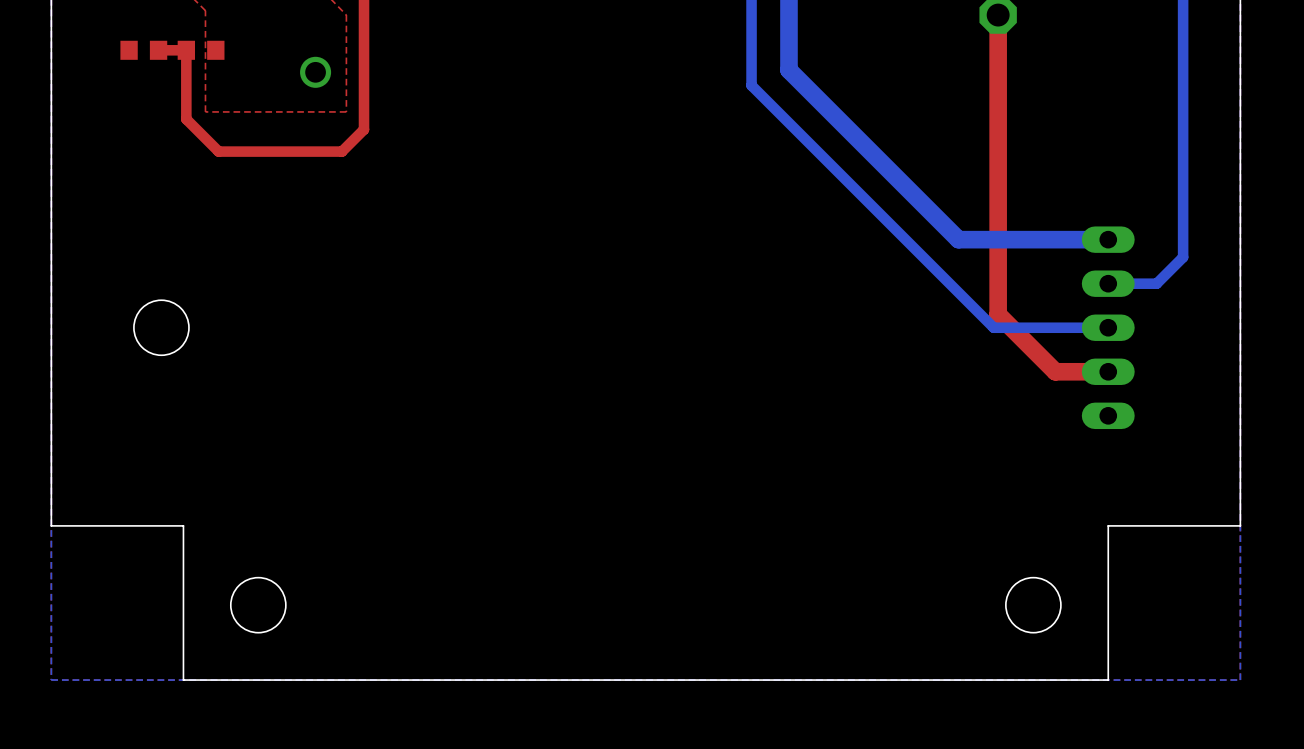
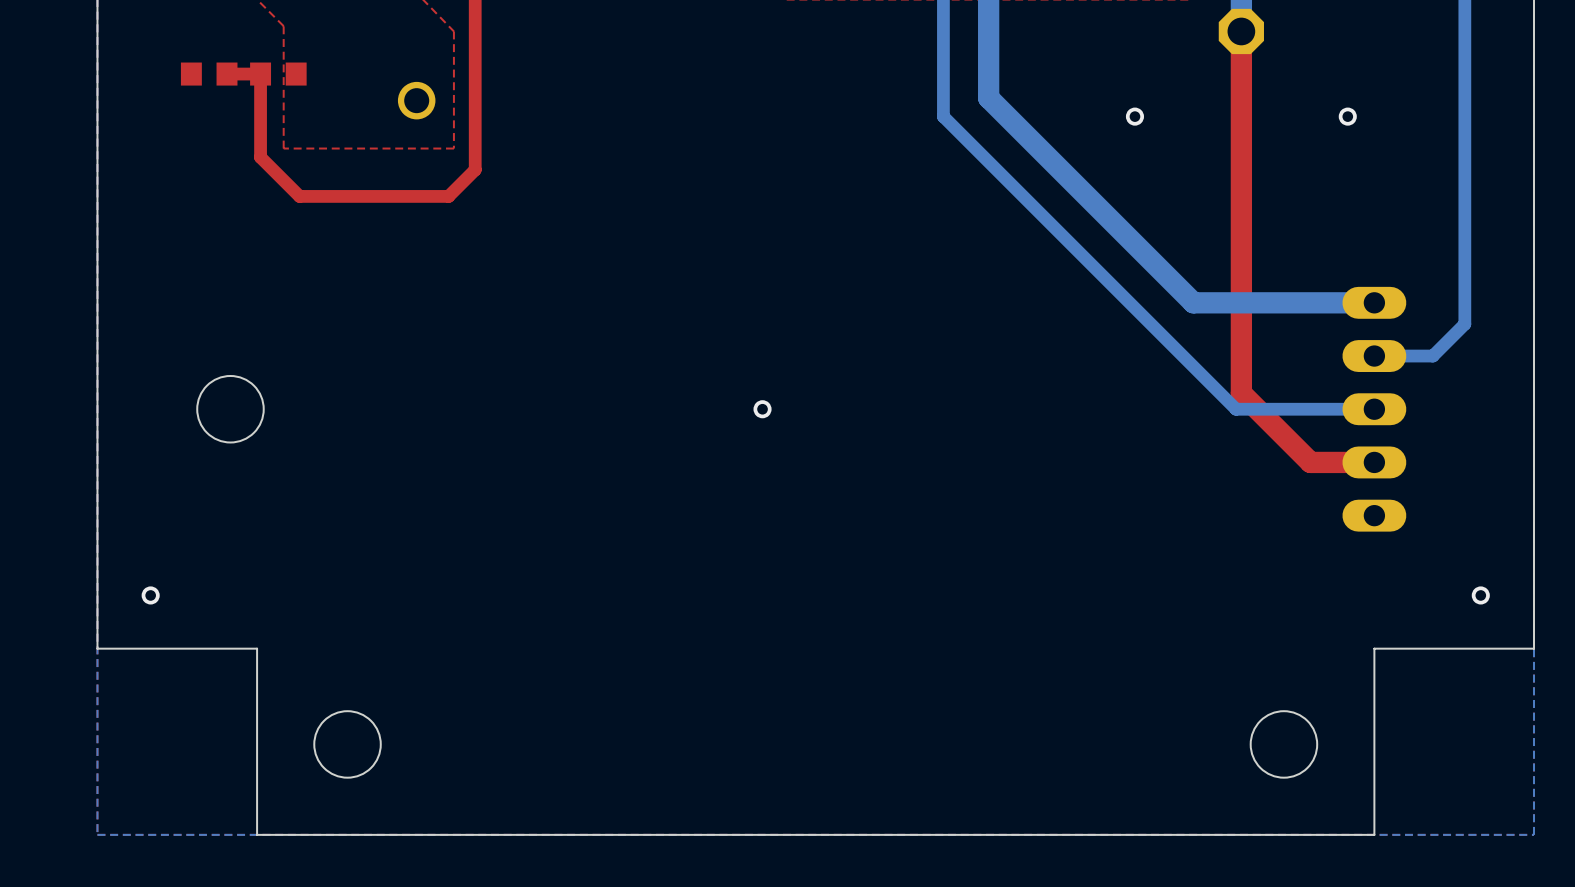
via: none -> (1134, 116)
via: none -> (1347, 116)
via: none -> (762, 409)
via: none -> (150, 595)
via: none -> (1480, 595)

